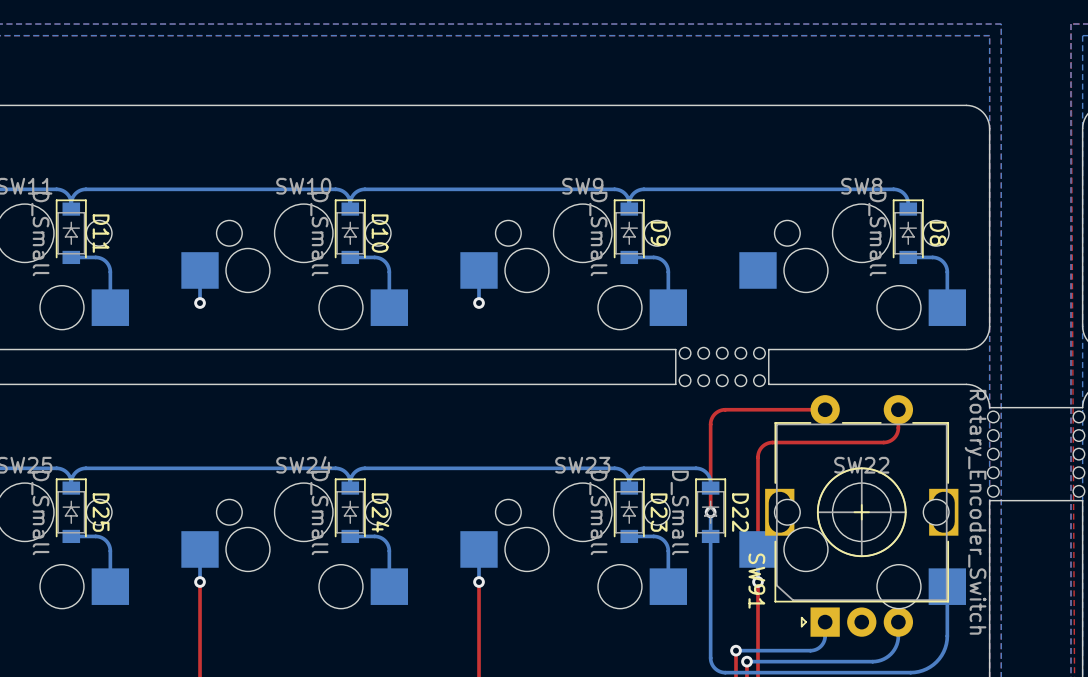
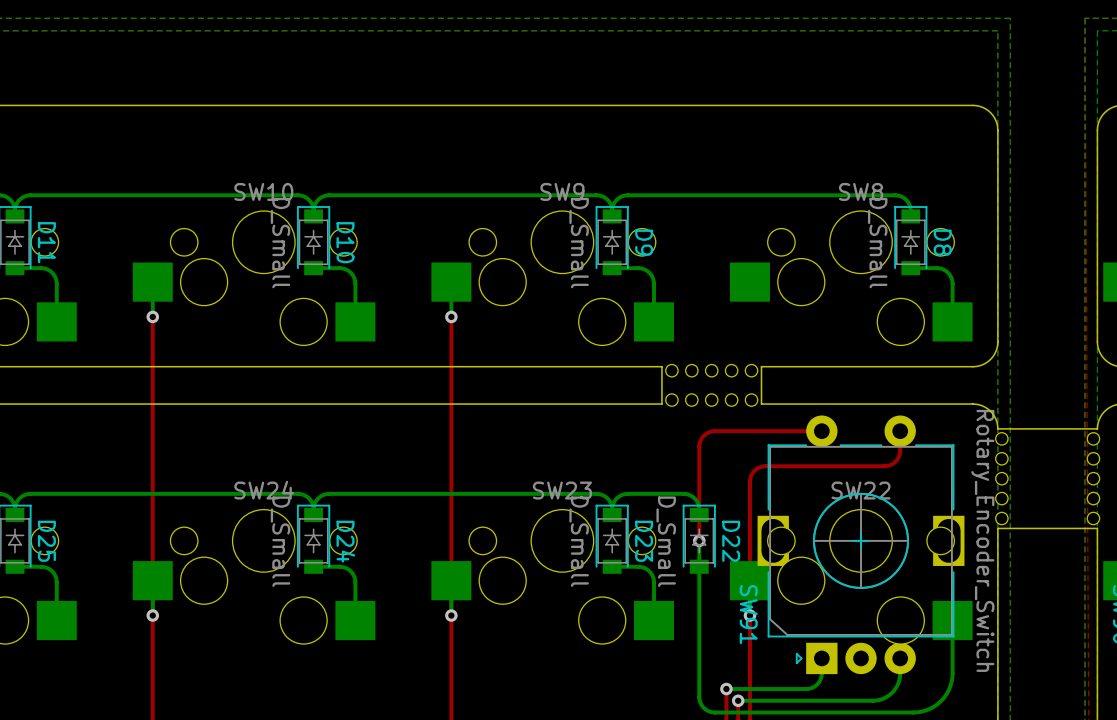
top track: none -> (152, 316) (152, 615)
top track: none -> (451, 316) (451, 615)

